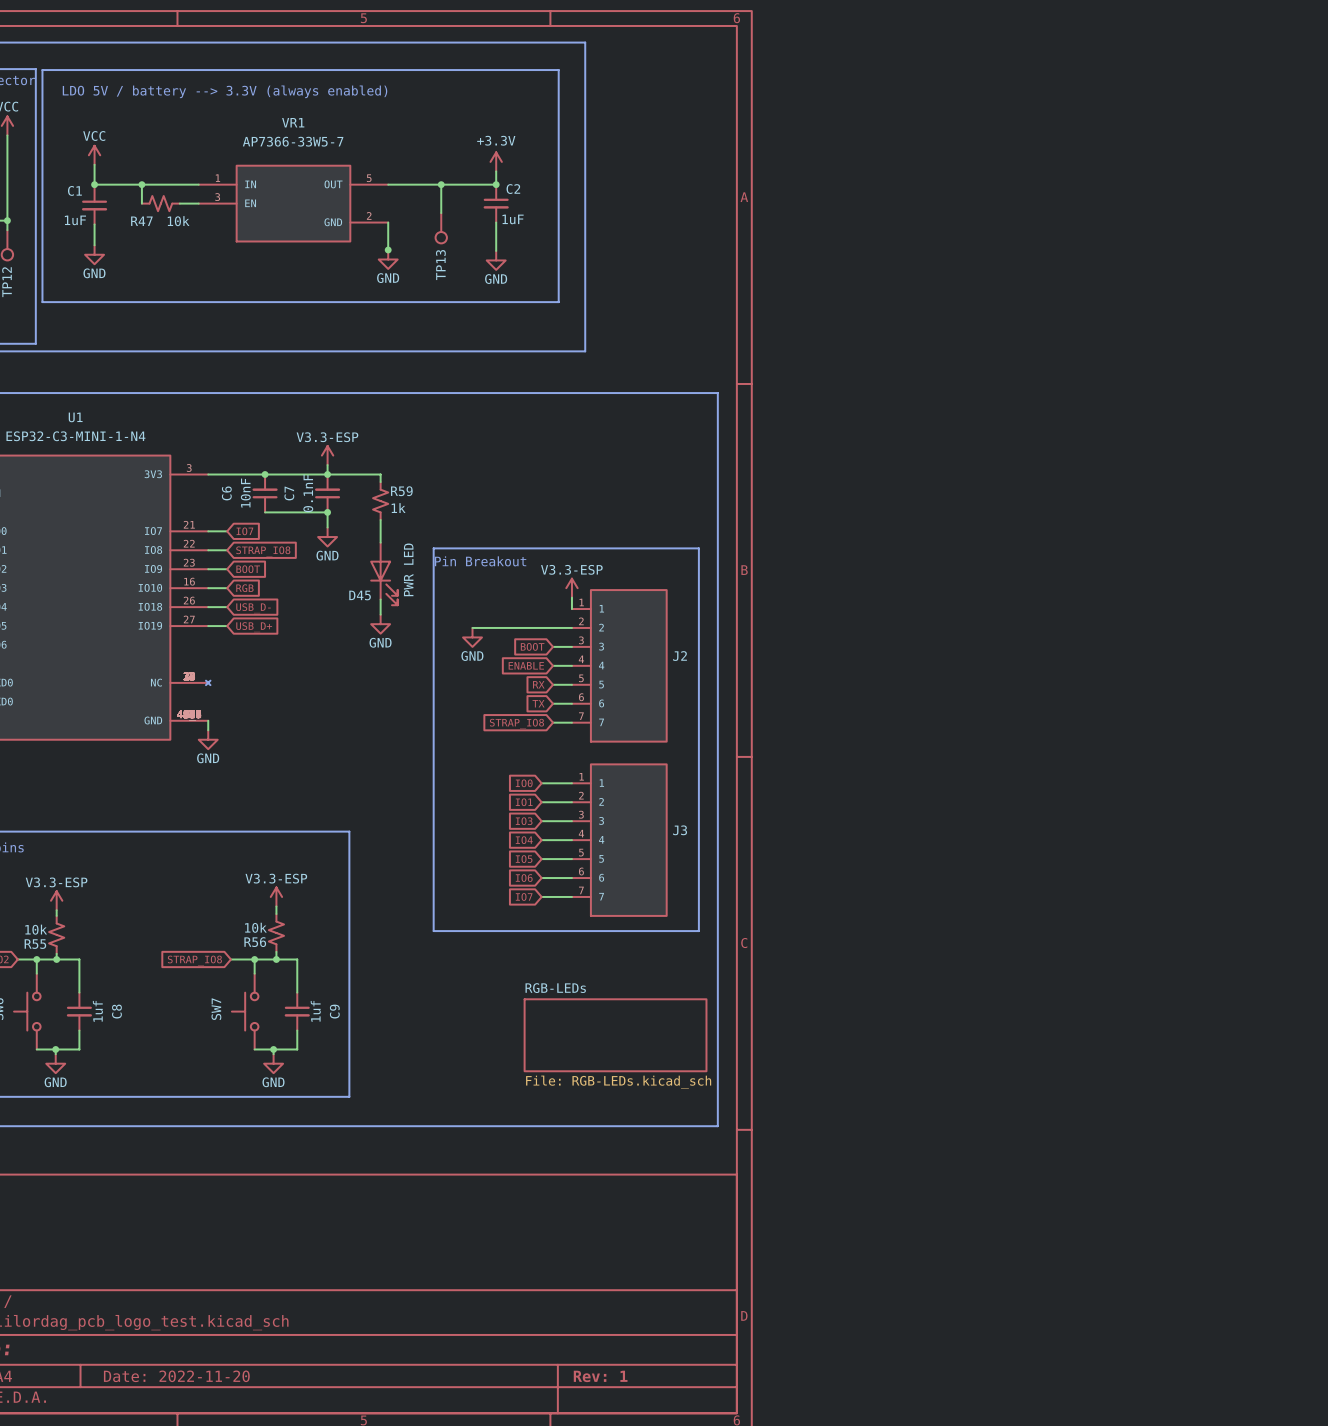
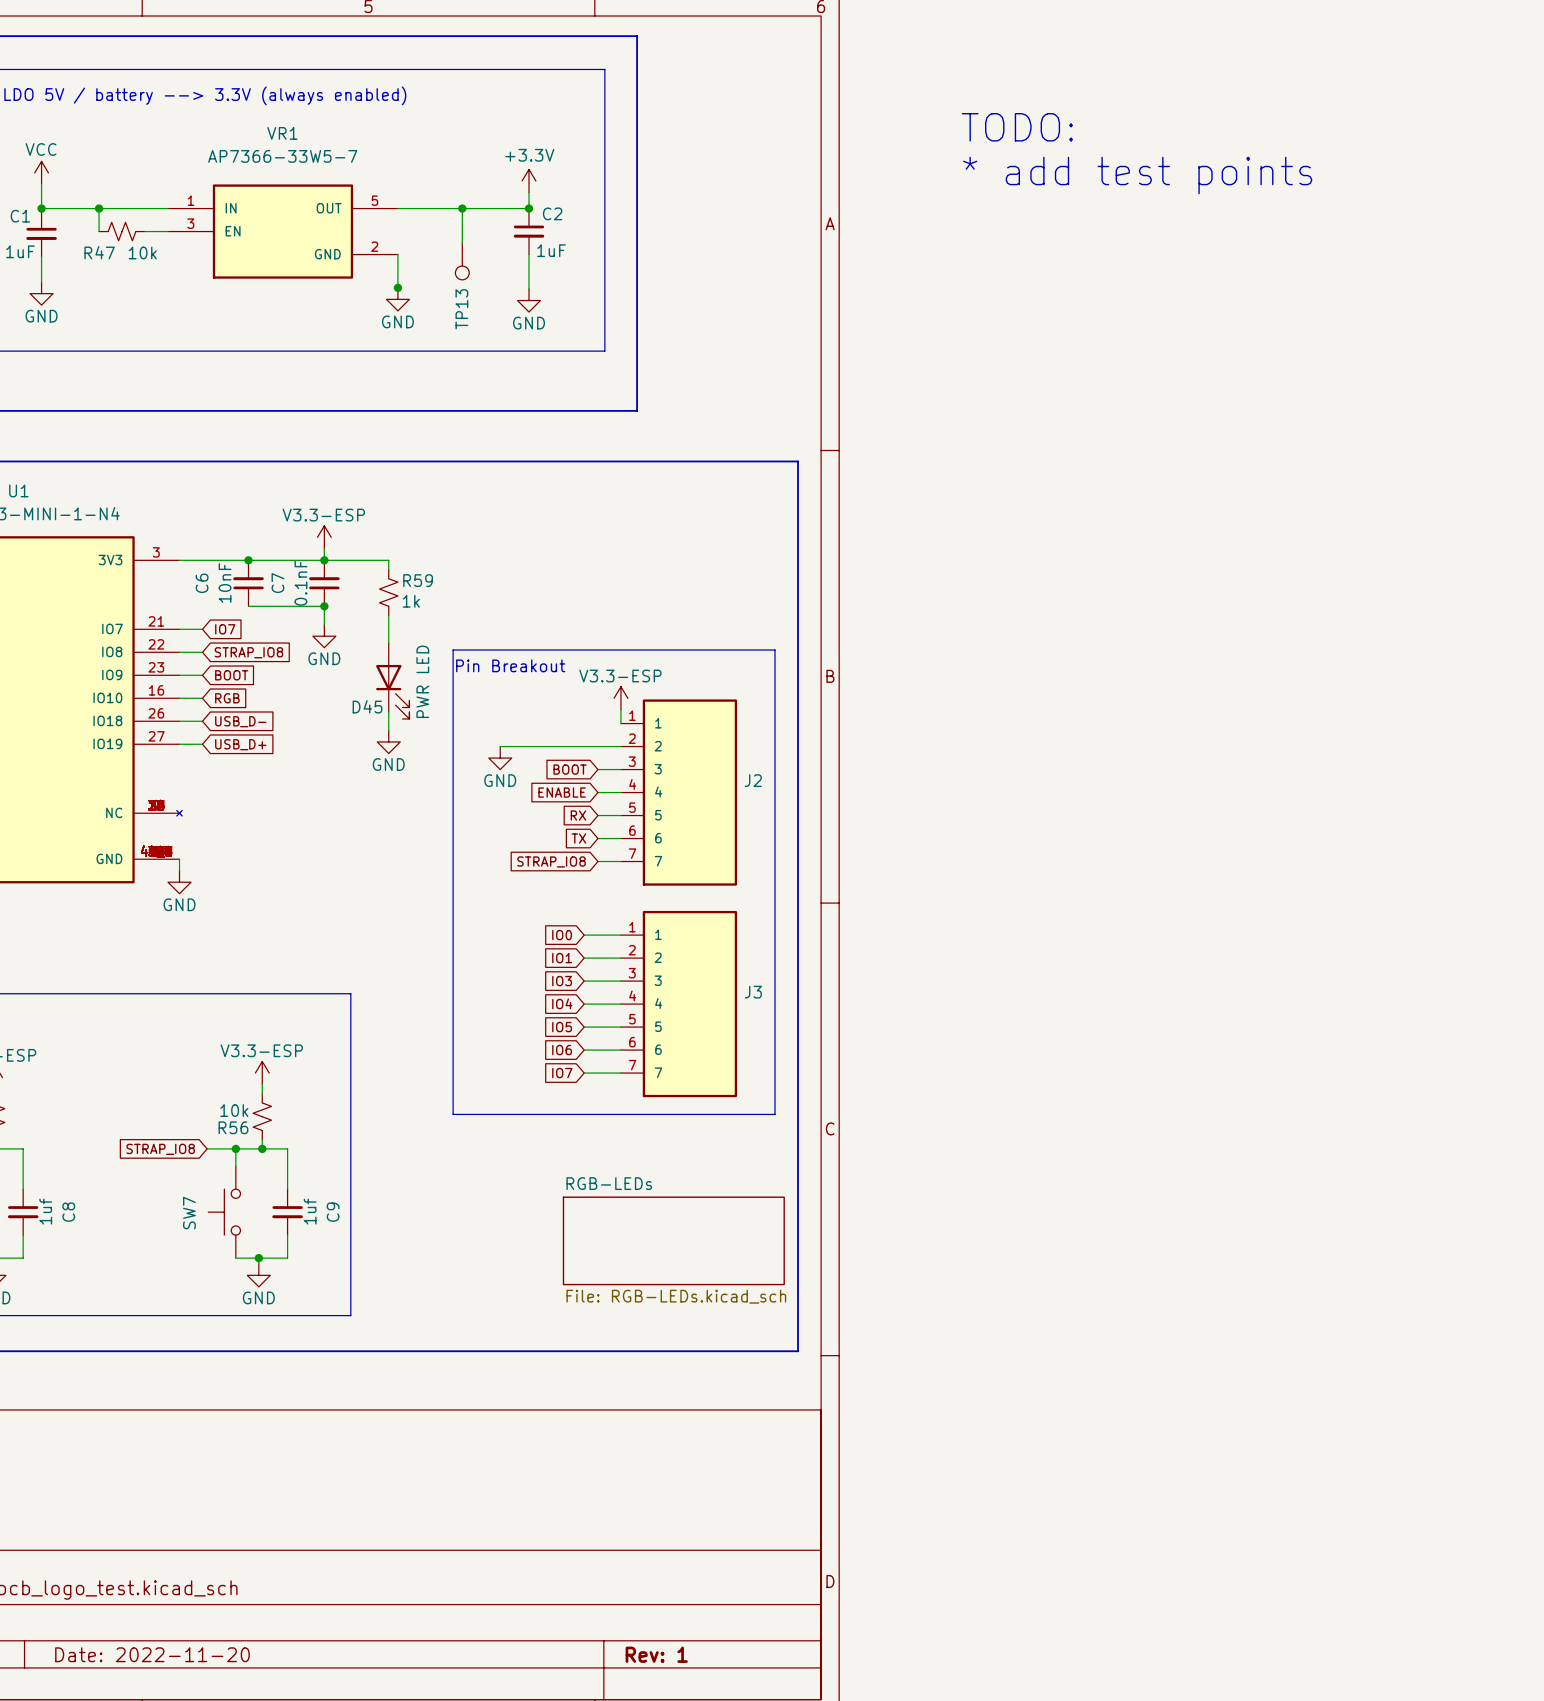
text: none -> TODO: (1017, 127)
text: none -> * add test points (1137, 175)

